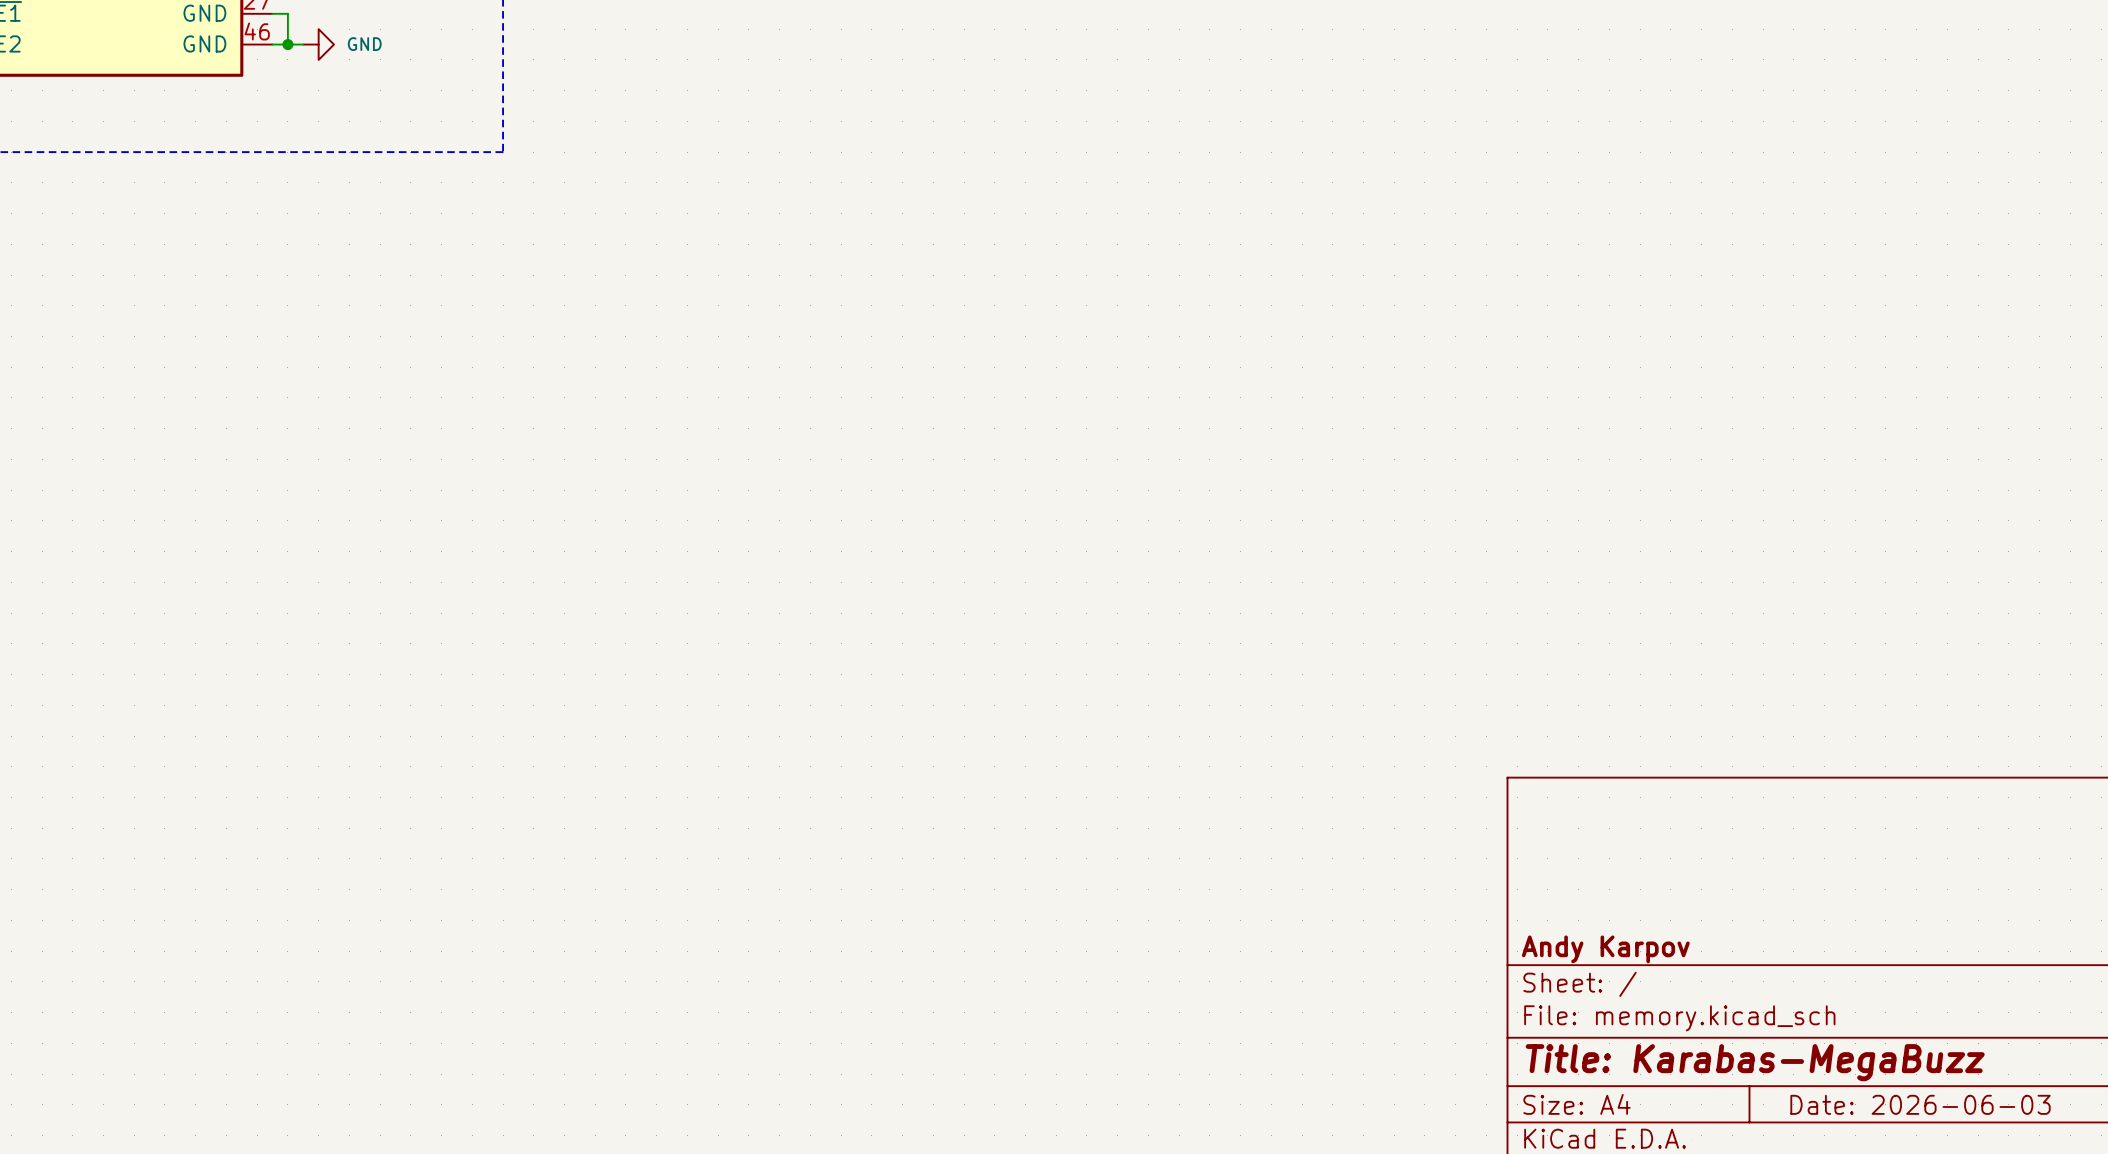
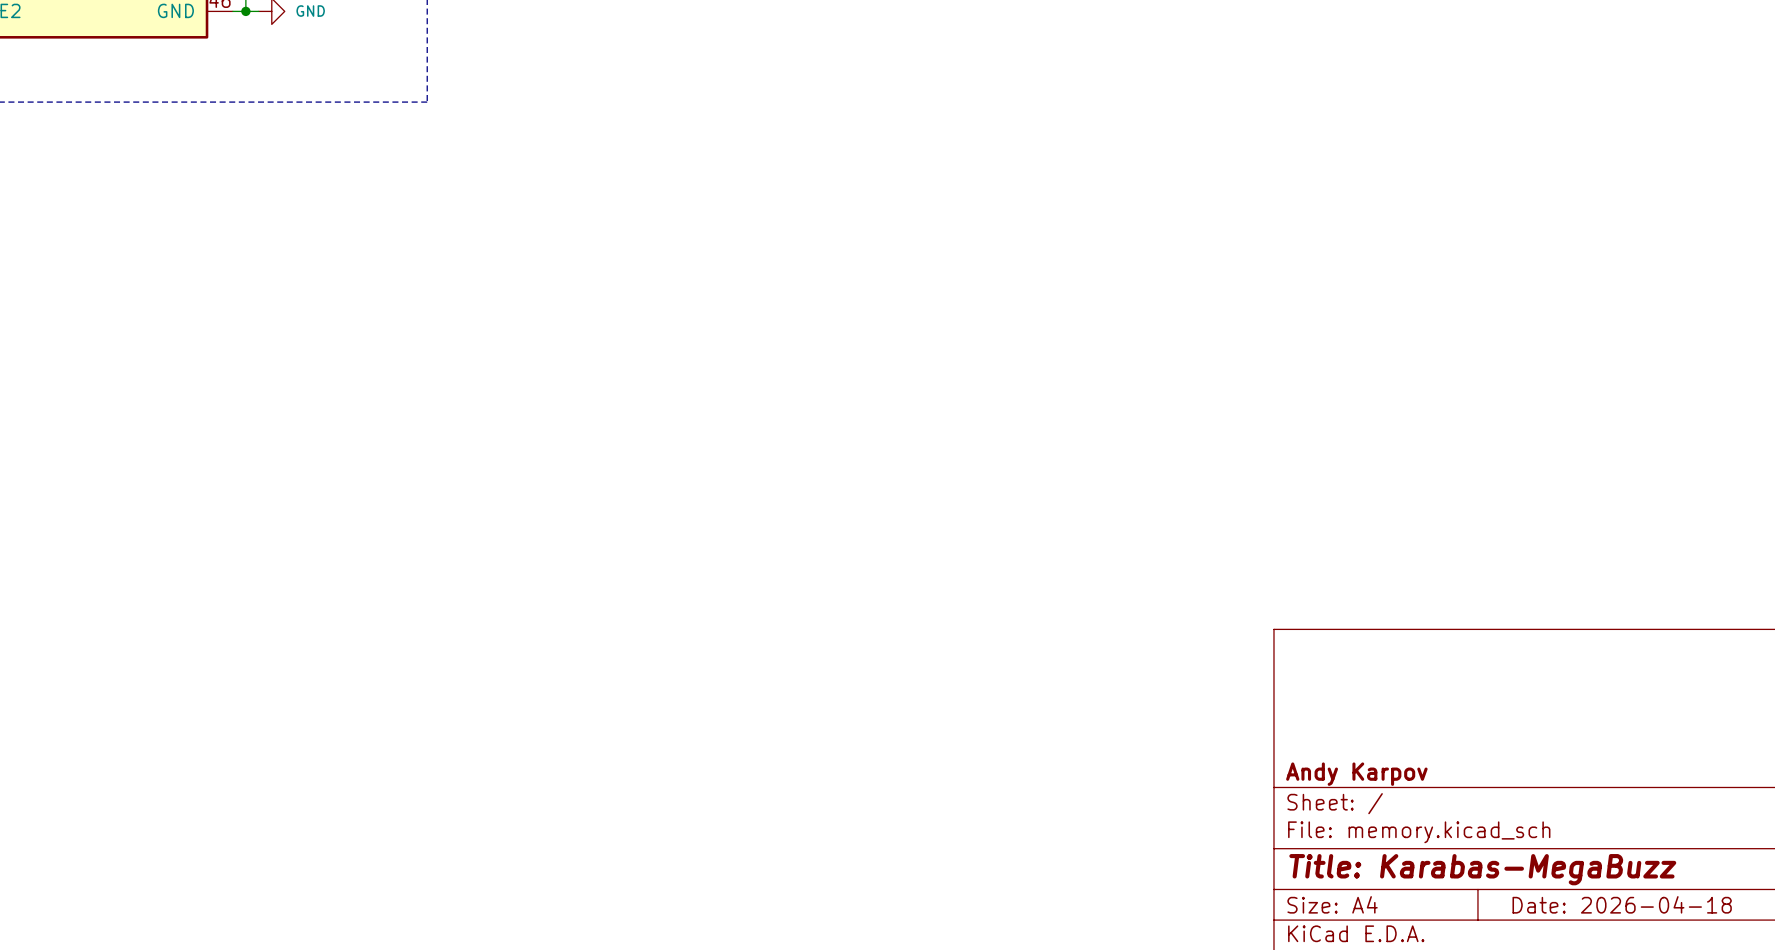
title block: Date: 2026-06-03 (1920, 1104) -> Date: 2026-04-18 (1622, 904)

